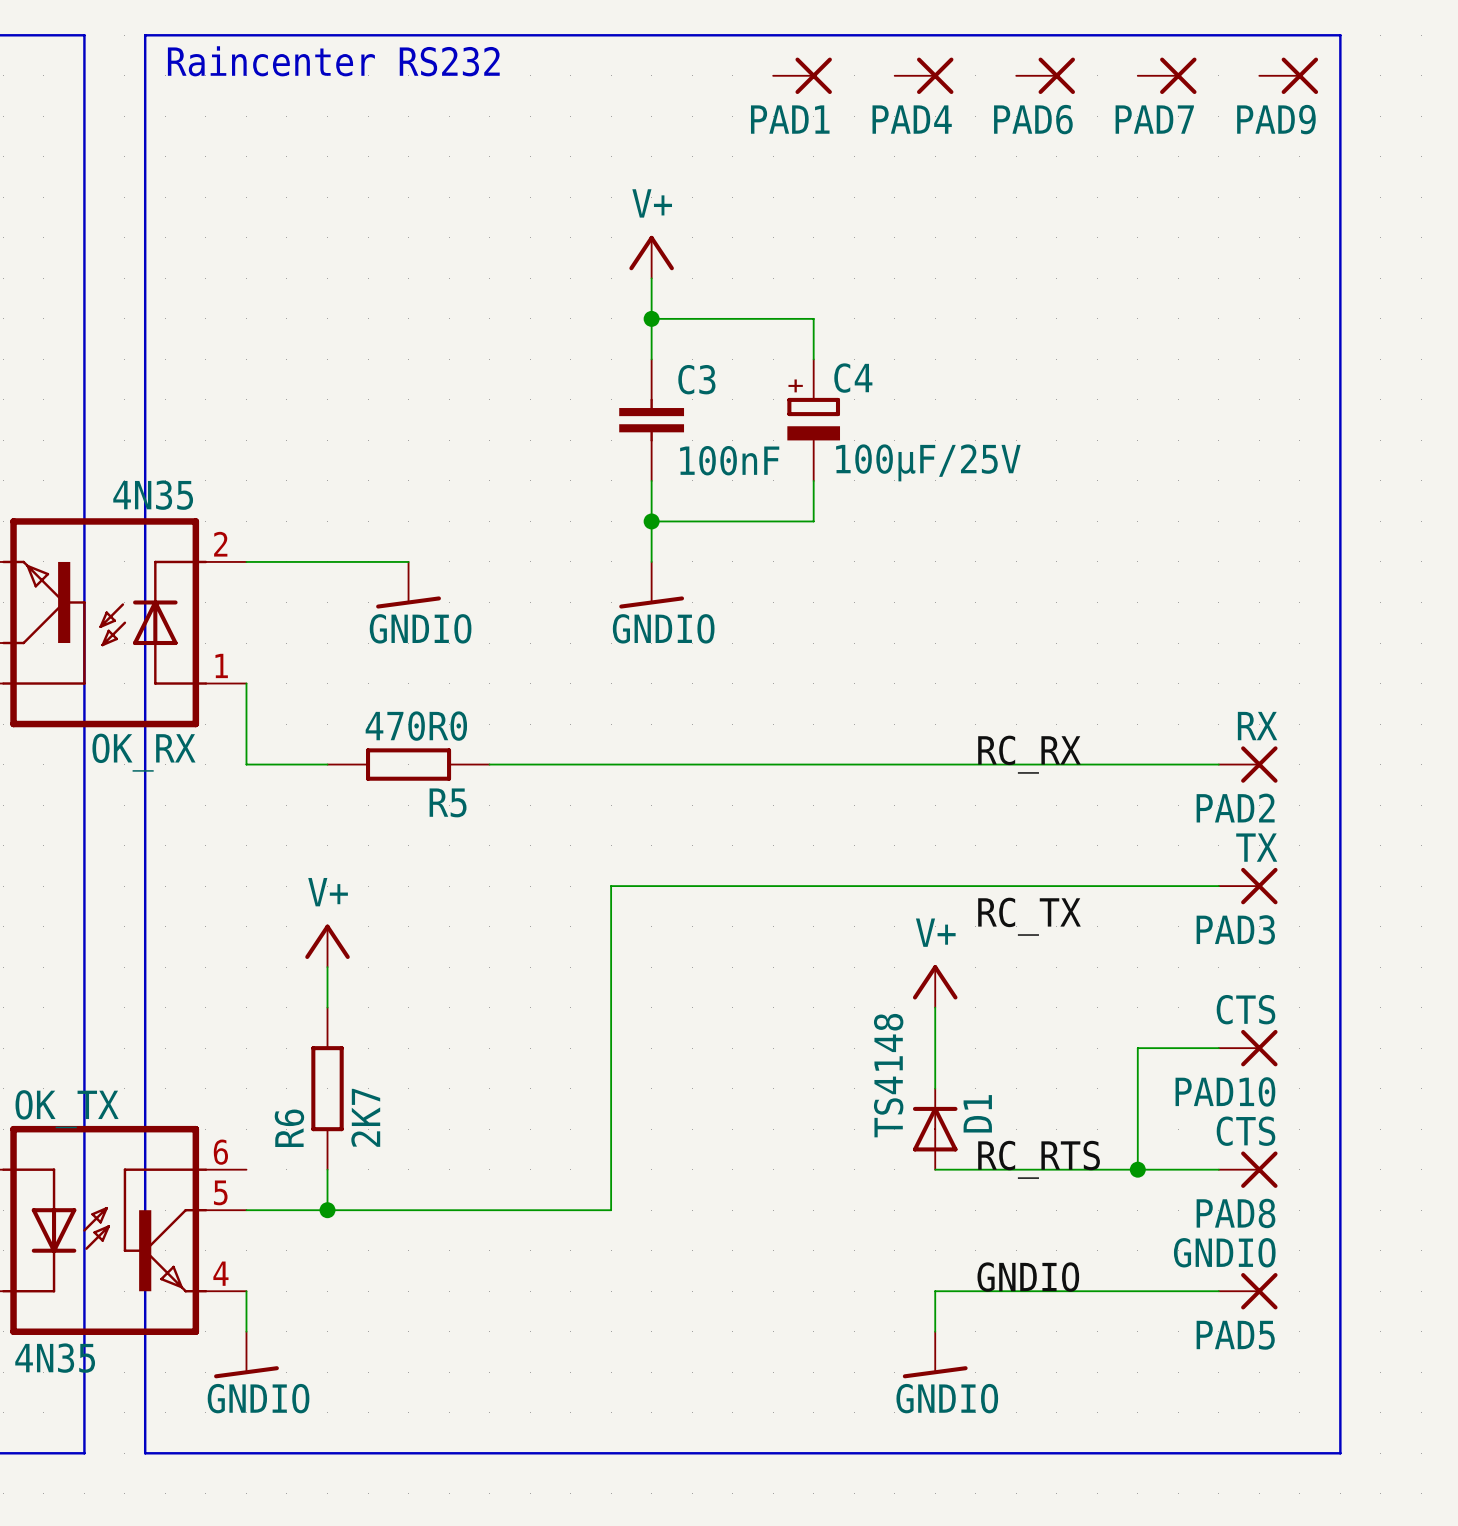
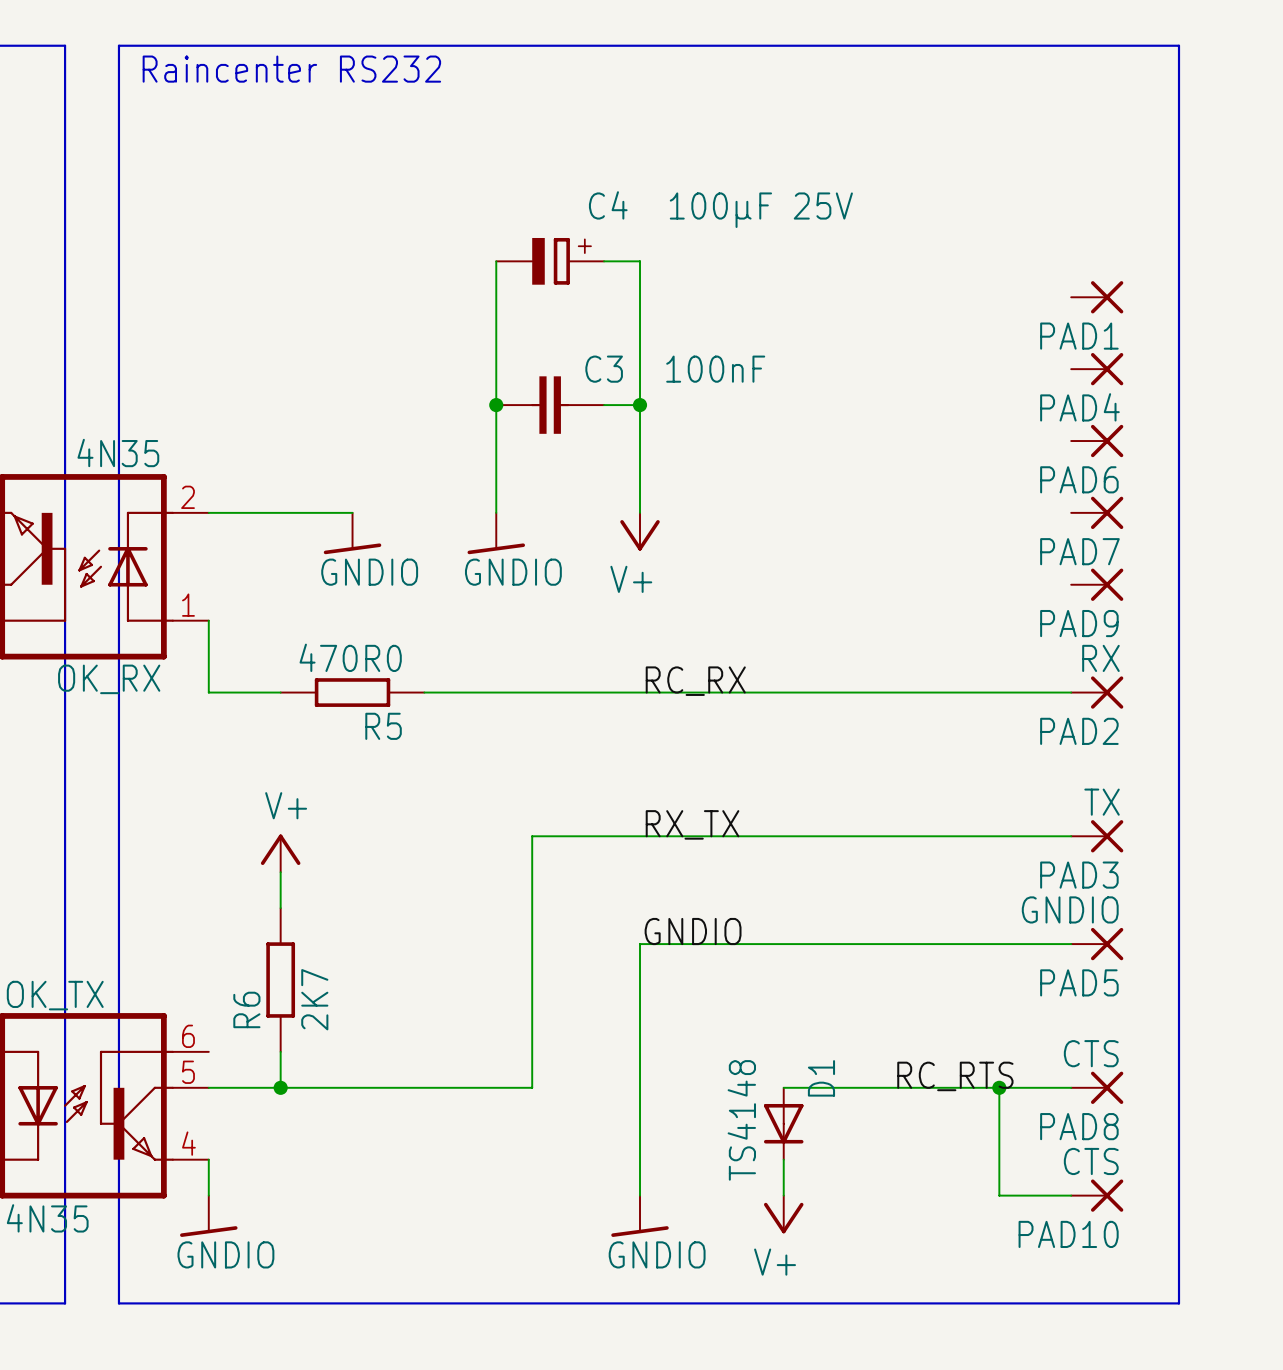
PAD1 position: (802, 75) -> (1097, 297)
PAD4 position: (924, 75) -> (1097, 369)
PAD6 position: (1045, 75) -> (1097, 441)
PAD7 position: (1167, 75) -> (1097, 512)
PAD9 position: (1288, 75) -> (1097, 584)
power symbol: V+ (651, 257) -> none
wire: none -> (496, 261) (496, 512)
wire: (651, 278) (651, 359) -> none
wire: none -> (604, 261) (640, 261) (640, 512)
wire: (651, 318) (813, 318) (813, 359) -> none
junction: (651, 318) -> none
C4 rotation: 0° (813, 419) -> 90° clockwise (551, 261)
C3 rotation: 0° (651, 420) -> 90° clockwise (550, 405)
C4 position: (813, 420) -> (550, 261)
junction: none -> (496, 405)
wire: none -> (604, 405) (640, 405)
junction: none -> (640, 405)
C3 value position: 100nF (729, 460) -> 100nF (715, 369)
C4 value: 100µF/25V (928, 462) -> 100µF 25V (761, 210)
wire: (651, 480) (651, 561) -> none
wire: (813, 480) (813, 521) (651, 521) -> none
junction: (651, 521) -> none
power symbol: none -> V+ (640, 531)
power symbol position: GNDIO (651, 585) -> GNDIO (496, 533)
label position: RC_RX (1029, 754) -> RC_RX (695, 681)
wire: (1218, 886) (611, 886) (611, 926) -> (1071, 836) (532, 836)
PAD3 position: (1248, 886) -> (1097, 836)
label: RC_TX (1029, 916) -> none
label: none -> RX_TX (692, 824)
power symbol: V+ (935, 986) -> none
wire: (935, 1007) (935, 1088) -> none
PAD10 value: CTS (1245, 1009) -> GNDIO (1070, 909)
wire: (1137, 1048) (1137, 1169) -> (999, 944) (640, 944) (640, 1195)
D1 value position: TS4148 (888, 1075) -> TS4148 (741, 1120)
PAD10 name: PAD10 (1225, 1091) -> PAD5 (1079, 982)
D1 name position: D1 (977, 1113) -> D1 (821, 1078)
D1 rotation: 0° (935, 1129) -> 180° (783, 1123)
D1 position: (935, 1129) -> (783, 1123)
label position: RC_RTS (1039, 1159) -> RC_RTS (955, 1076)
wire: (935, 1169) (1218, 1169) -> none
junction position: (1137, 1169) -> (999, 1087)
PAD8 position: (1248, 1169) -> (1097, 1087)
wire: none -> (783, 1087) (1071, 1087)
wire: none -> (999, 1087) (999, 1195) (1071, 1195)
label position: GNDIO (1028, 1277) -> GNDIO (693, 931)
wire: none -> (783, 1159) (783, 1195)
wire: (1218, 1291) (935, 1291) (935, 1331) -> none
PAD5: GNDIO (1248, 1291) -> none
PAD10: none -> CTS (1097, 1195)
power symbol: none -> V+ (783, 1214)
power symbol position: GNDIO (935, 1355) -> GNDIO (640, 1216)

